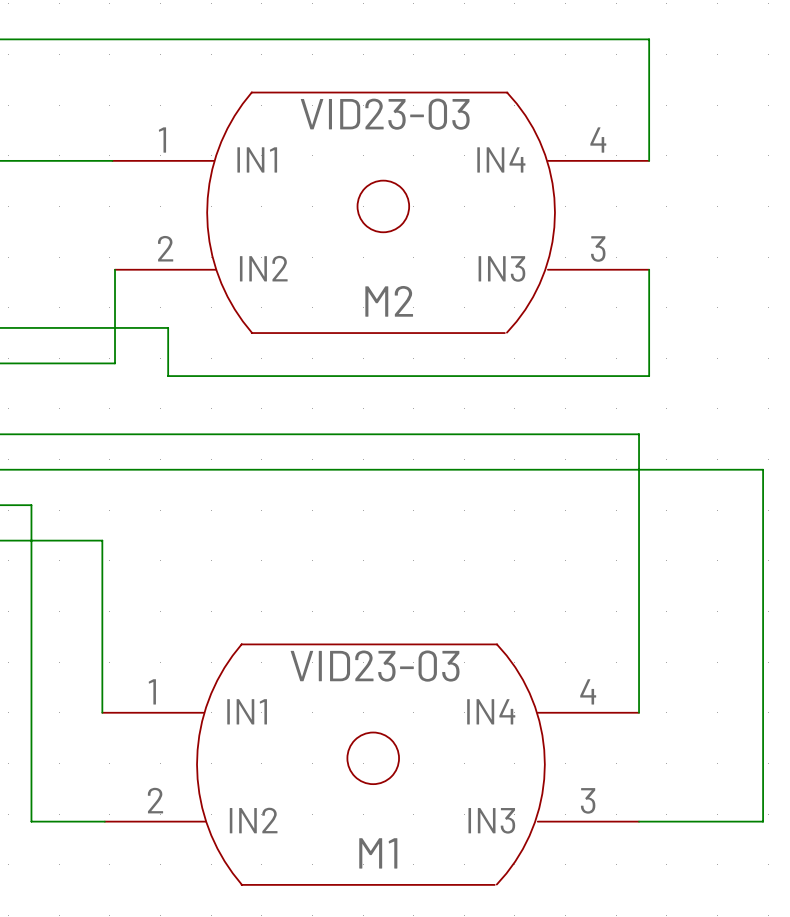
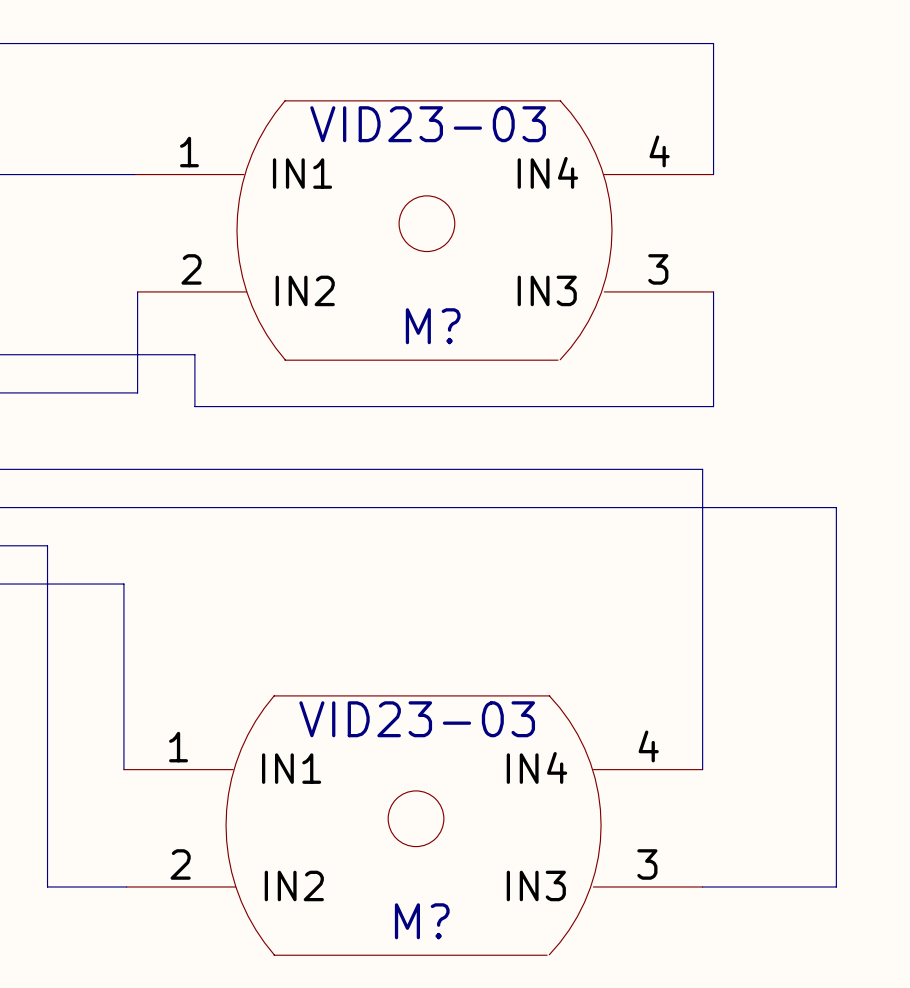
M2 name: M2 (389, 301) -> M? (433, 326)
M1 name: M1 (378, 853) -> M? (422, 921)

